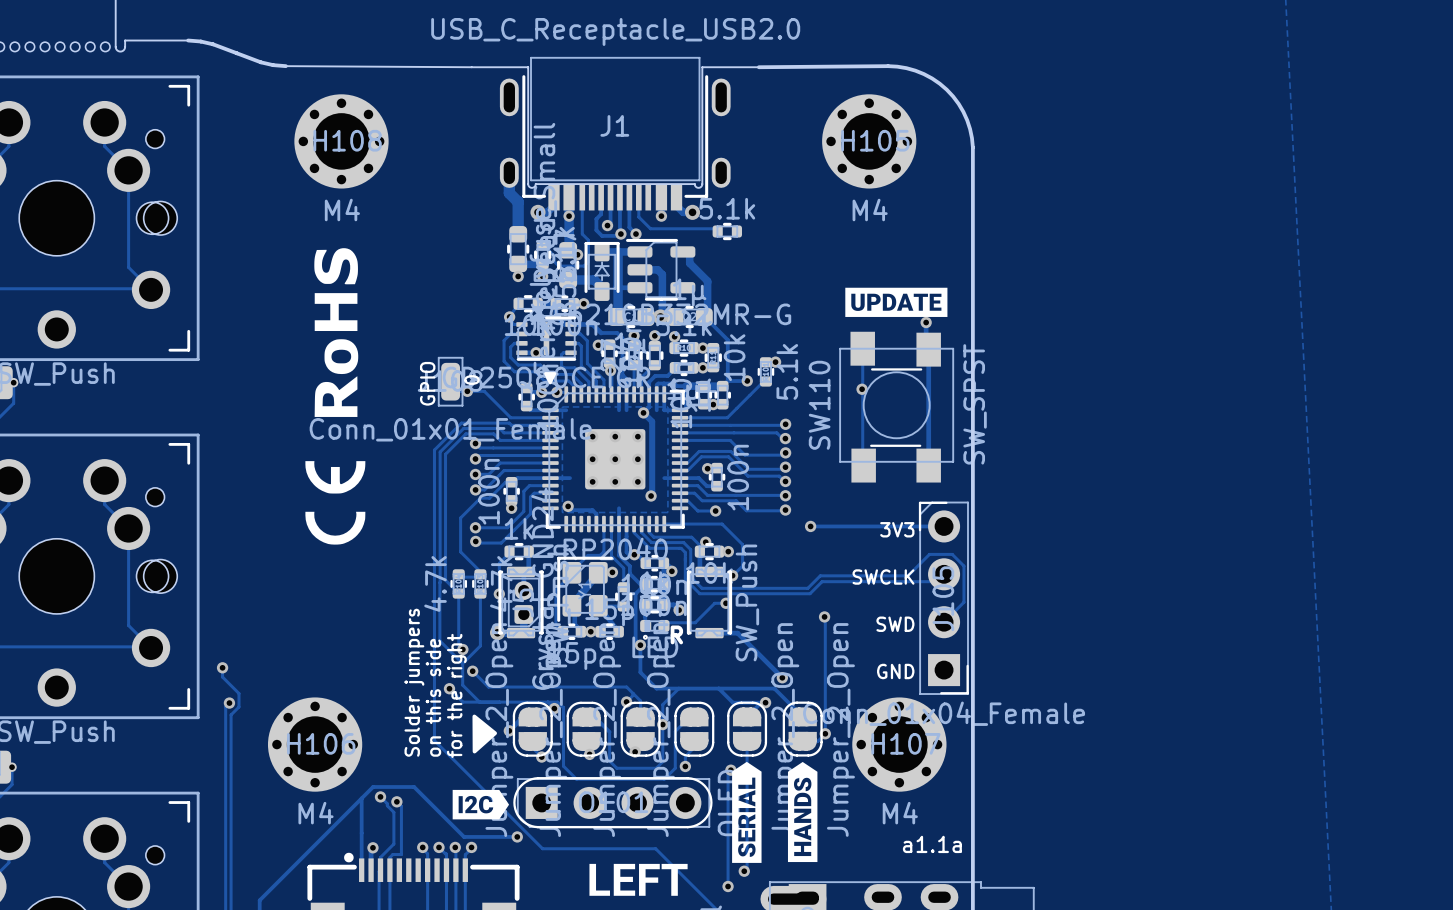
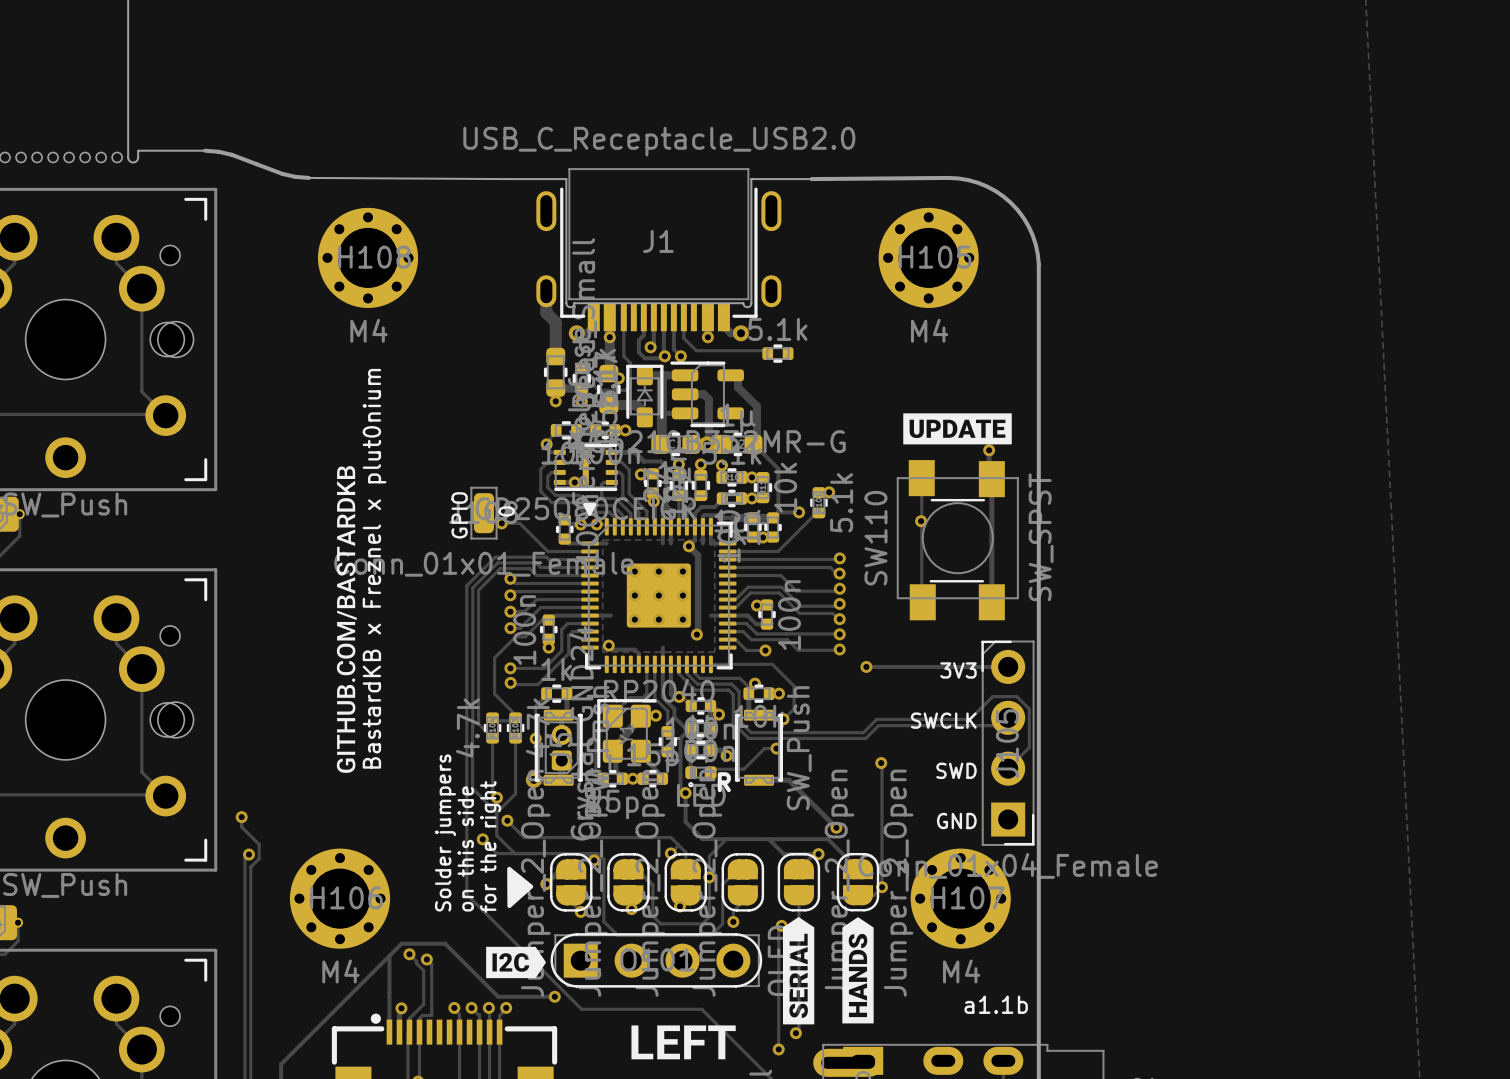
drawing: [314, 248, 359, 417] -> none
drawing: none -> [336, 466, 357, 773]
text: none -> BastardKB x Freznel x plut0nium (374, 568)
drawing: [305, 461, 366, 545] -> none
text: a1.1a (932, 844) -> a1.1b (996, 1004)

